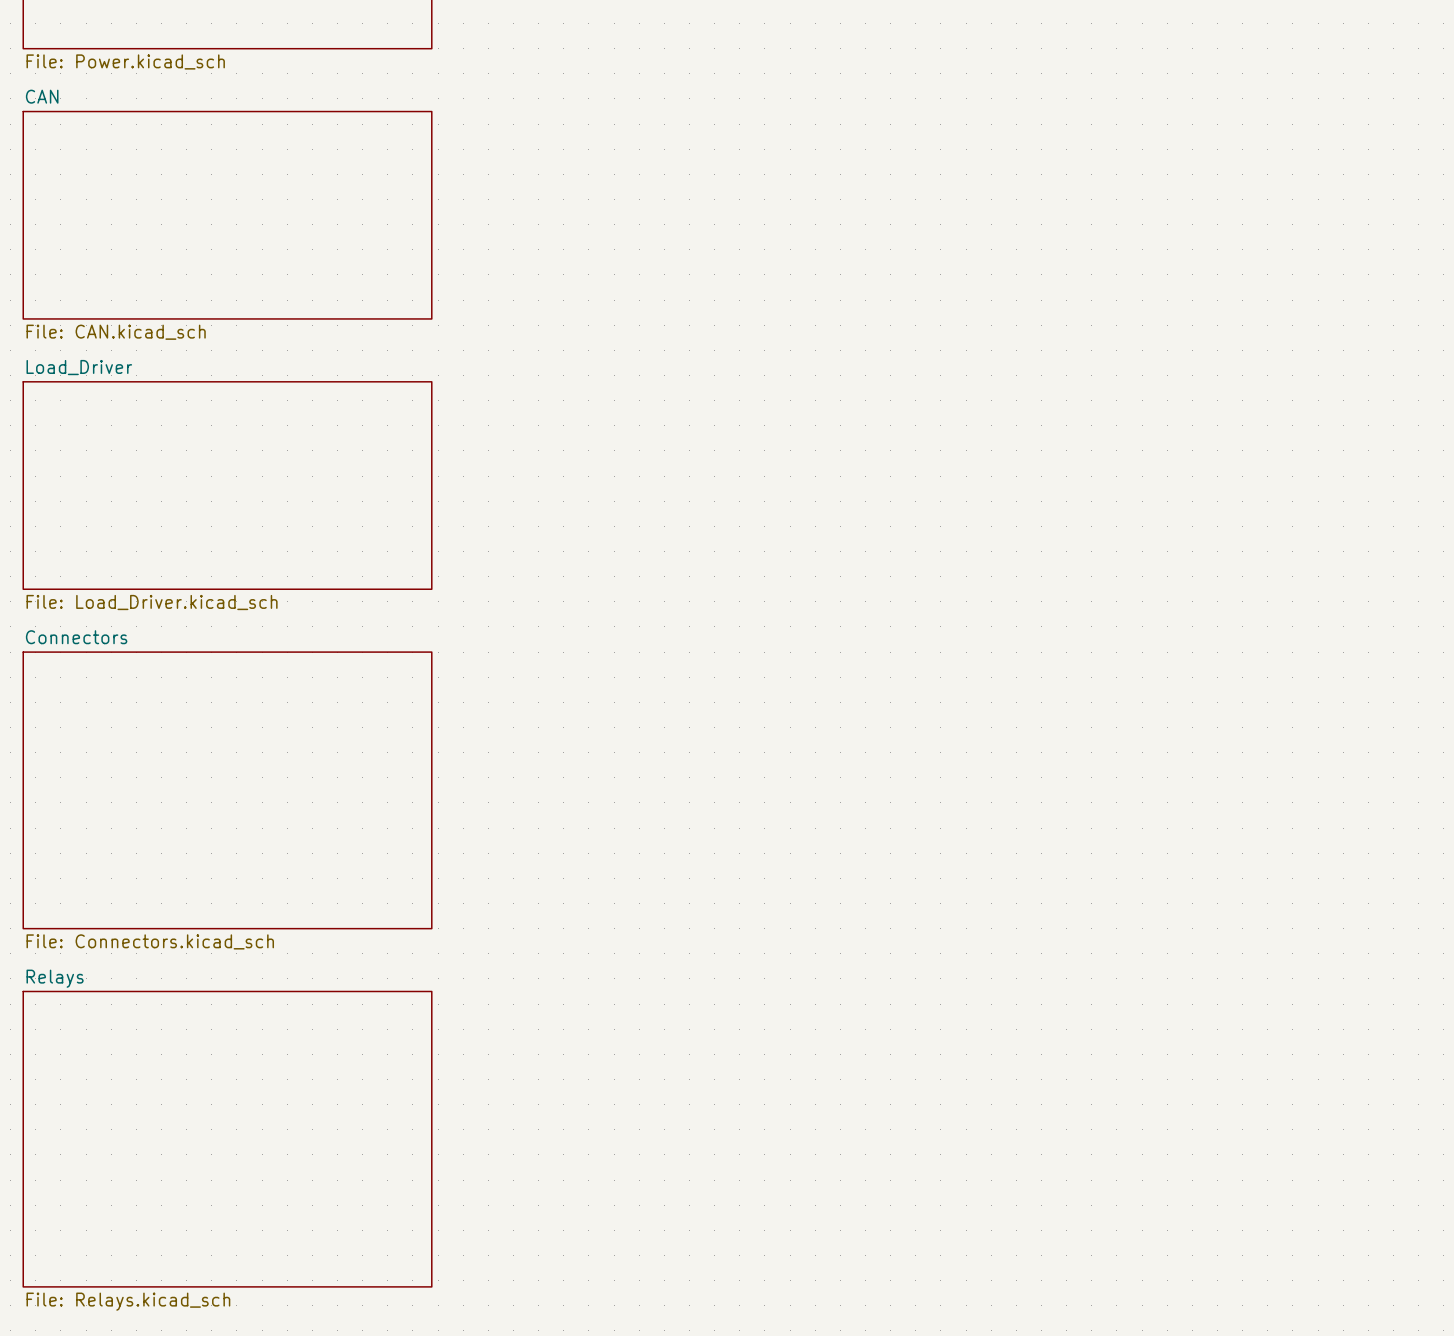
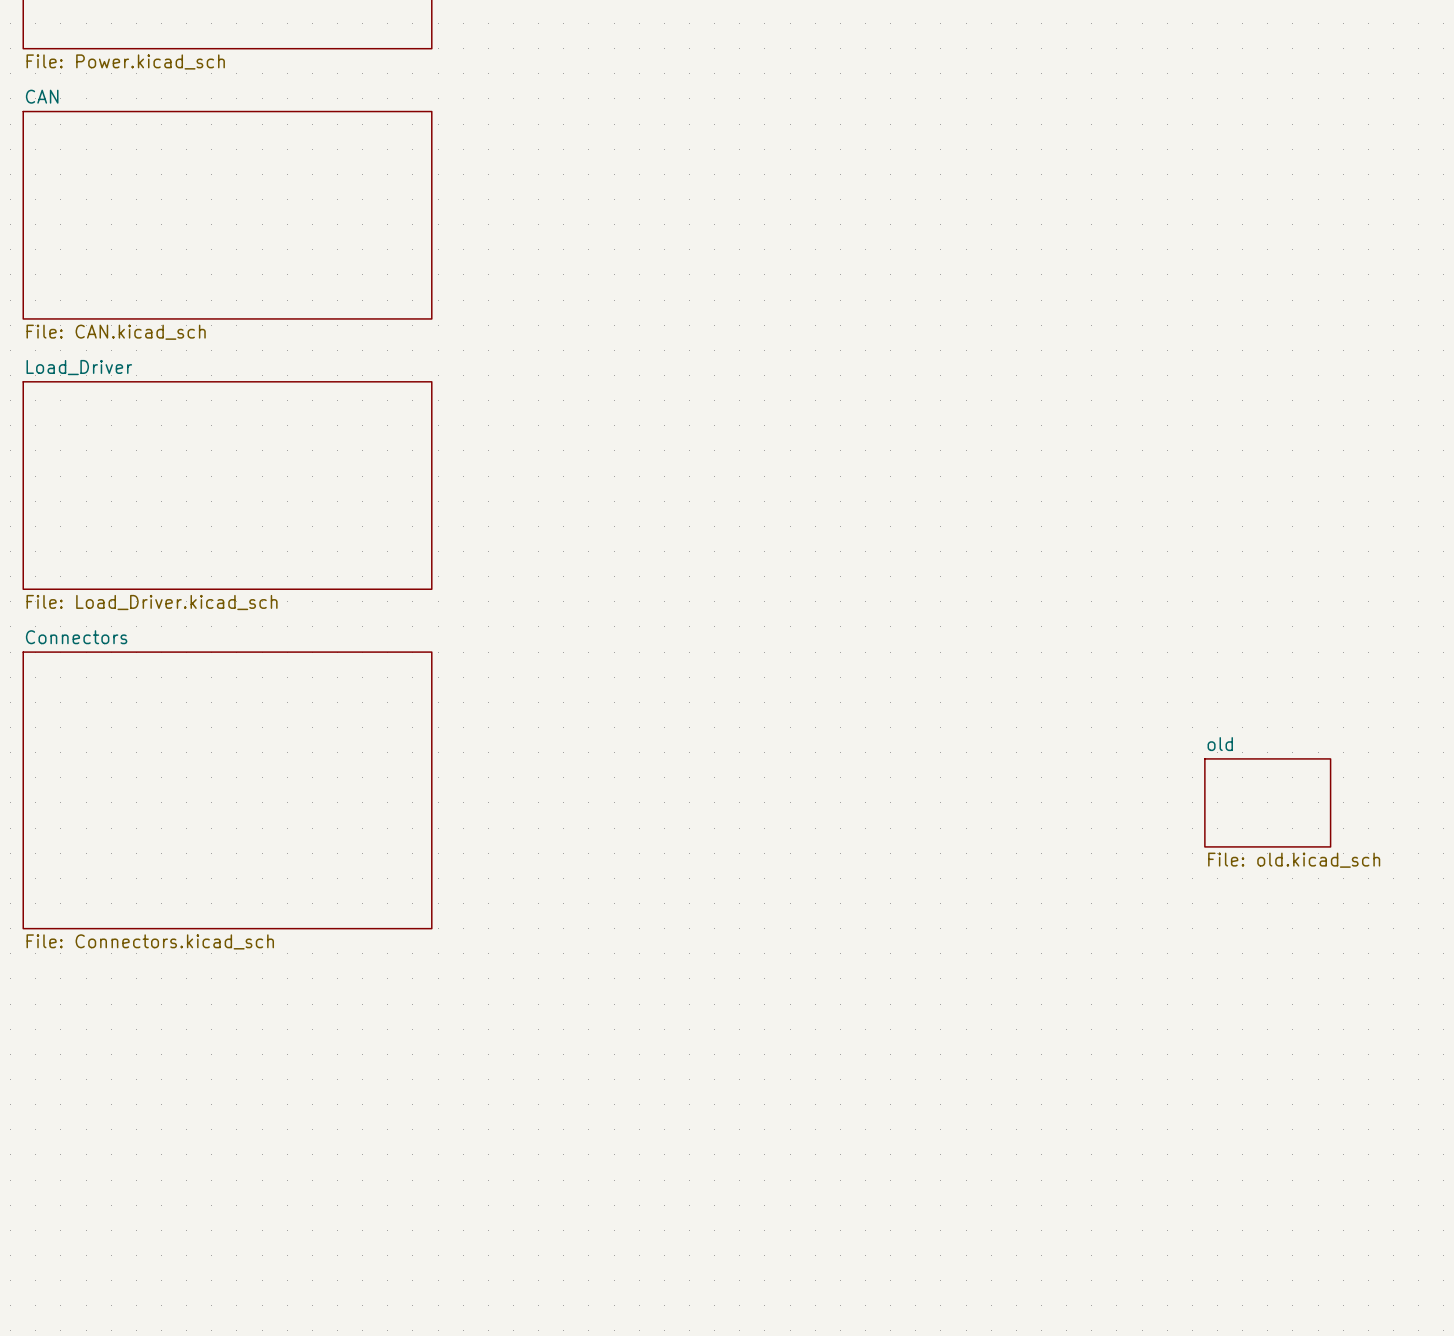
sheet old: none -> File: old.kicad_sch (1267, 802)
sheet Relays: File: Relays.kicad_sch (227, 1139) -> none

